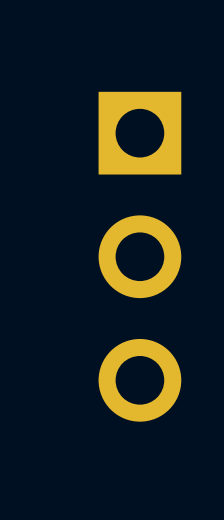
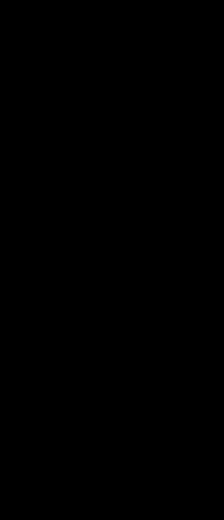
part: (139, 256) -> none

